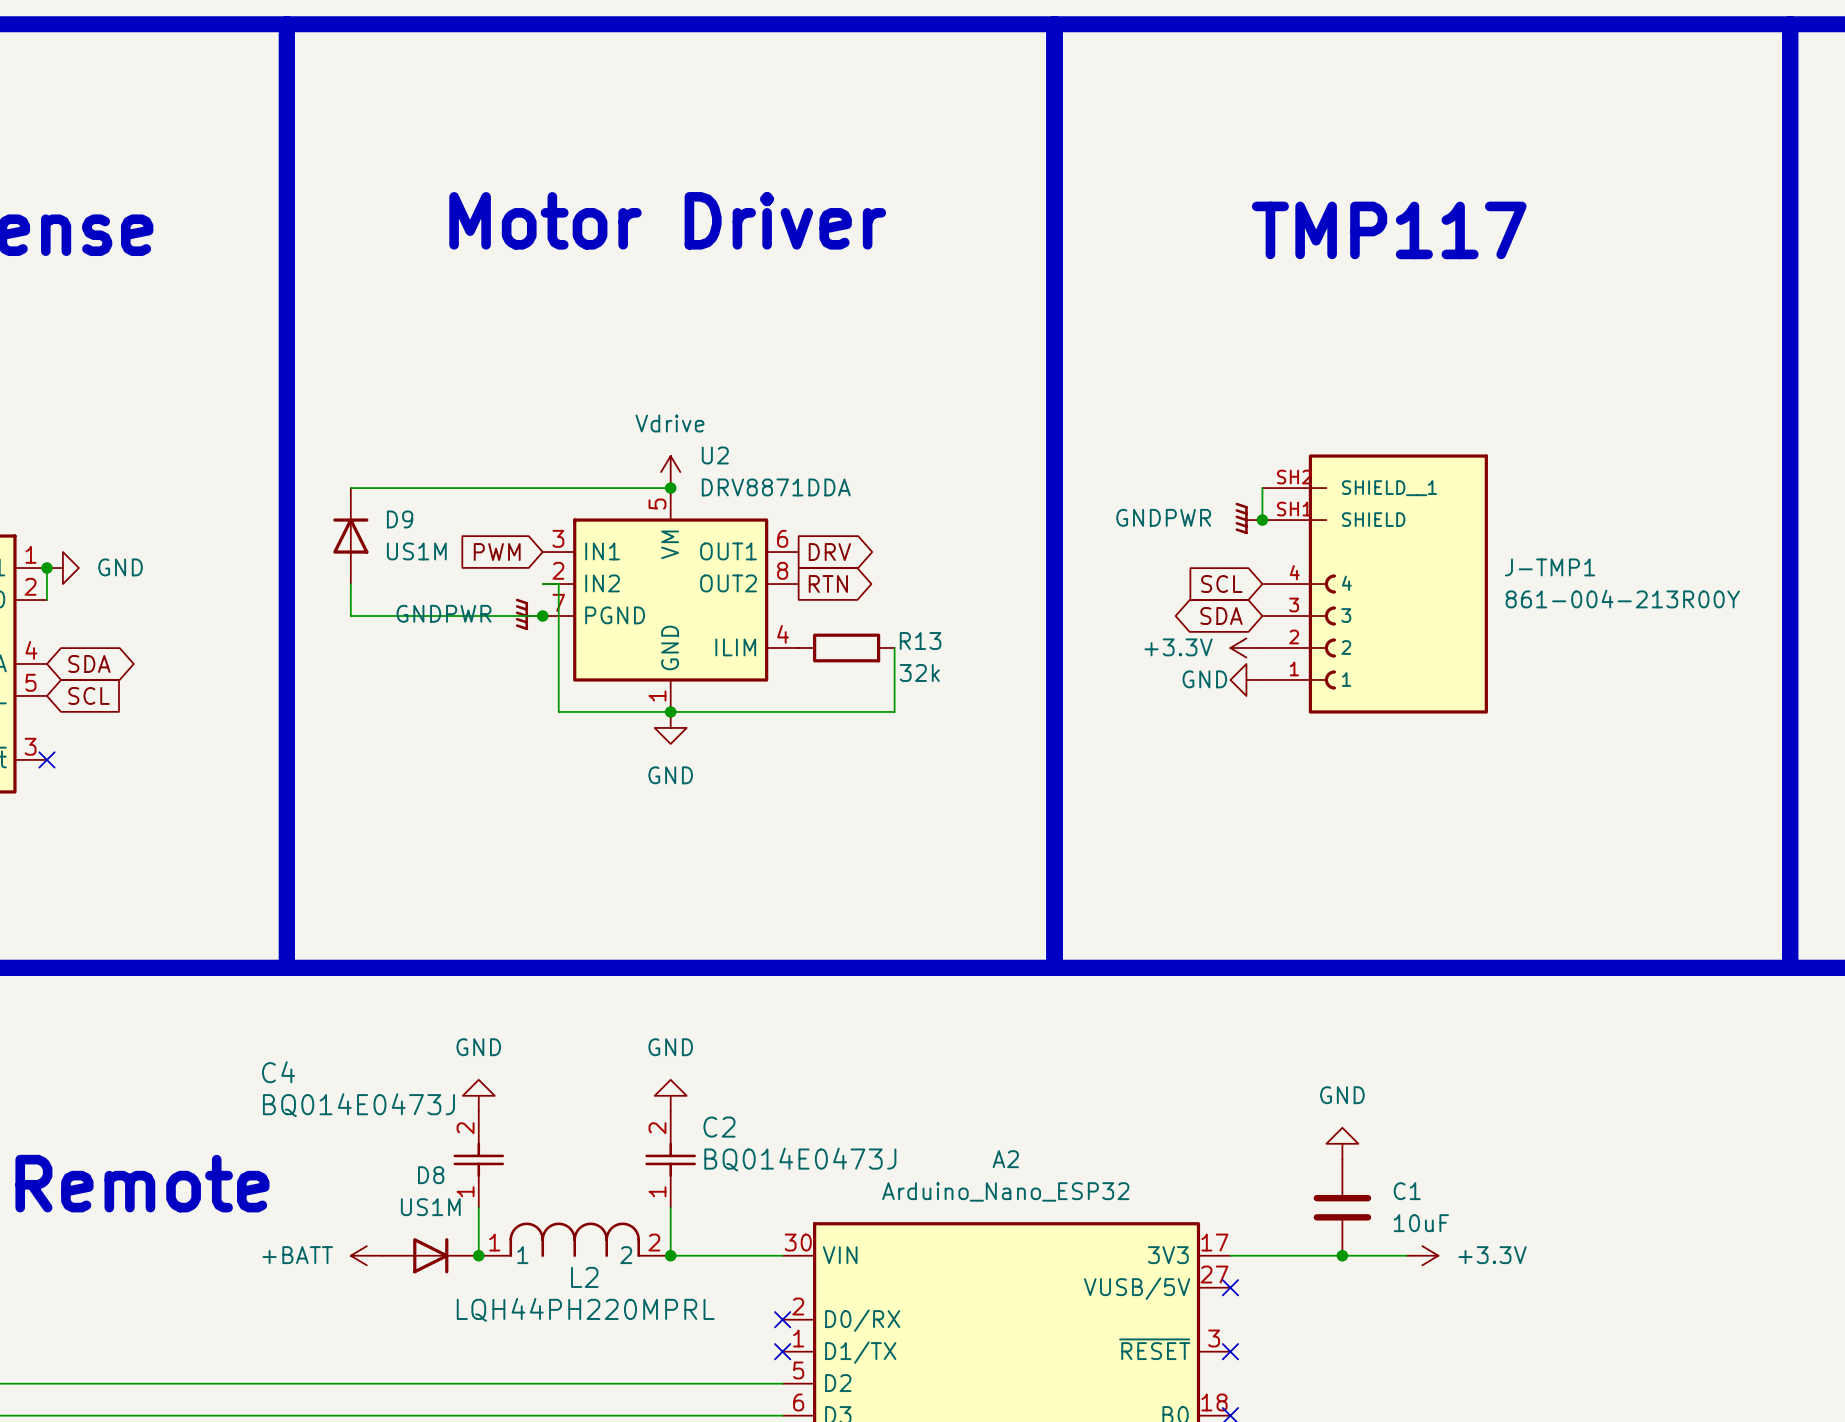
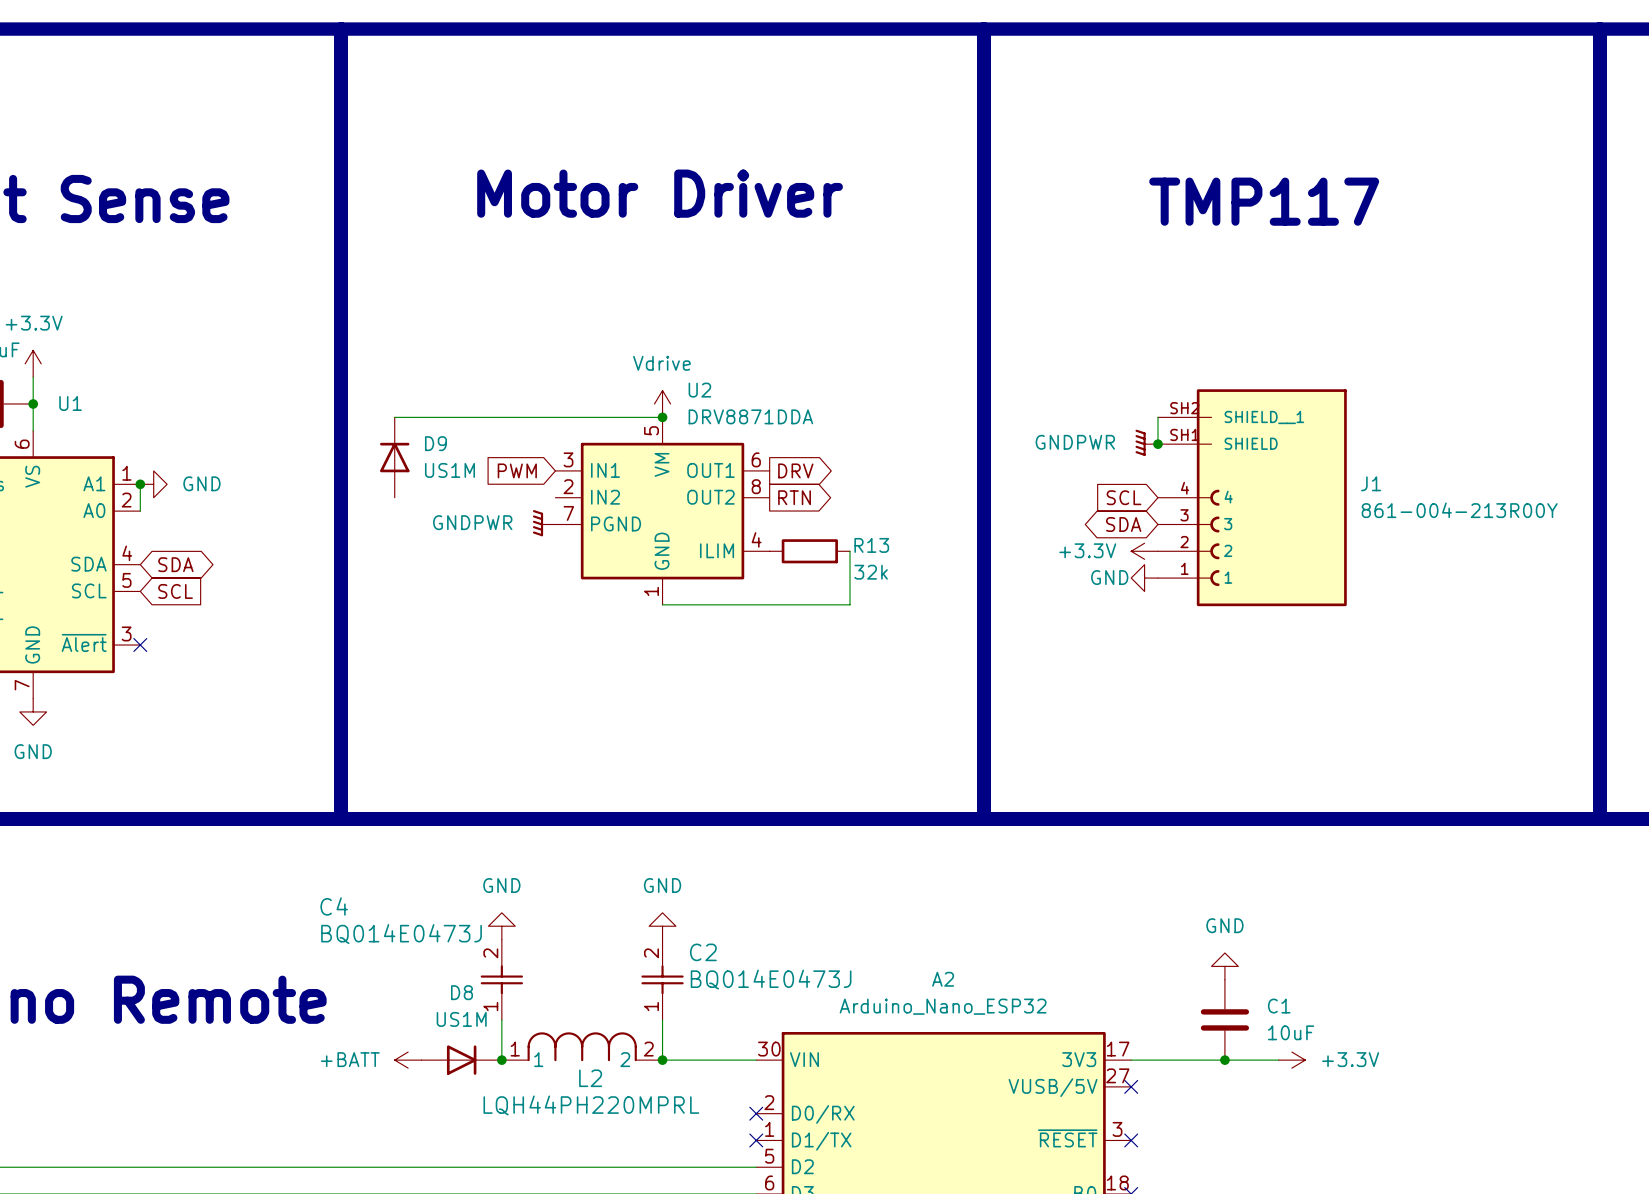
J-TMP1 name: J-TMP1 (1550, 567) -> J1 (1371, 483)
wire: (350, 584) (350, 616) (542, 616) -> none
wire: (542, 584) (558, 584) (558, 711) (670, 711) -> none
junction: (542, 616) -> none
junction: (670, 711) -> none
power symbol: GND (670, 727) -> none

